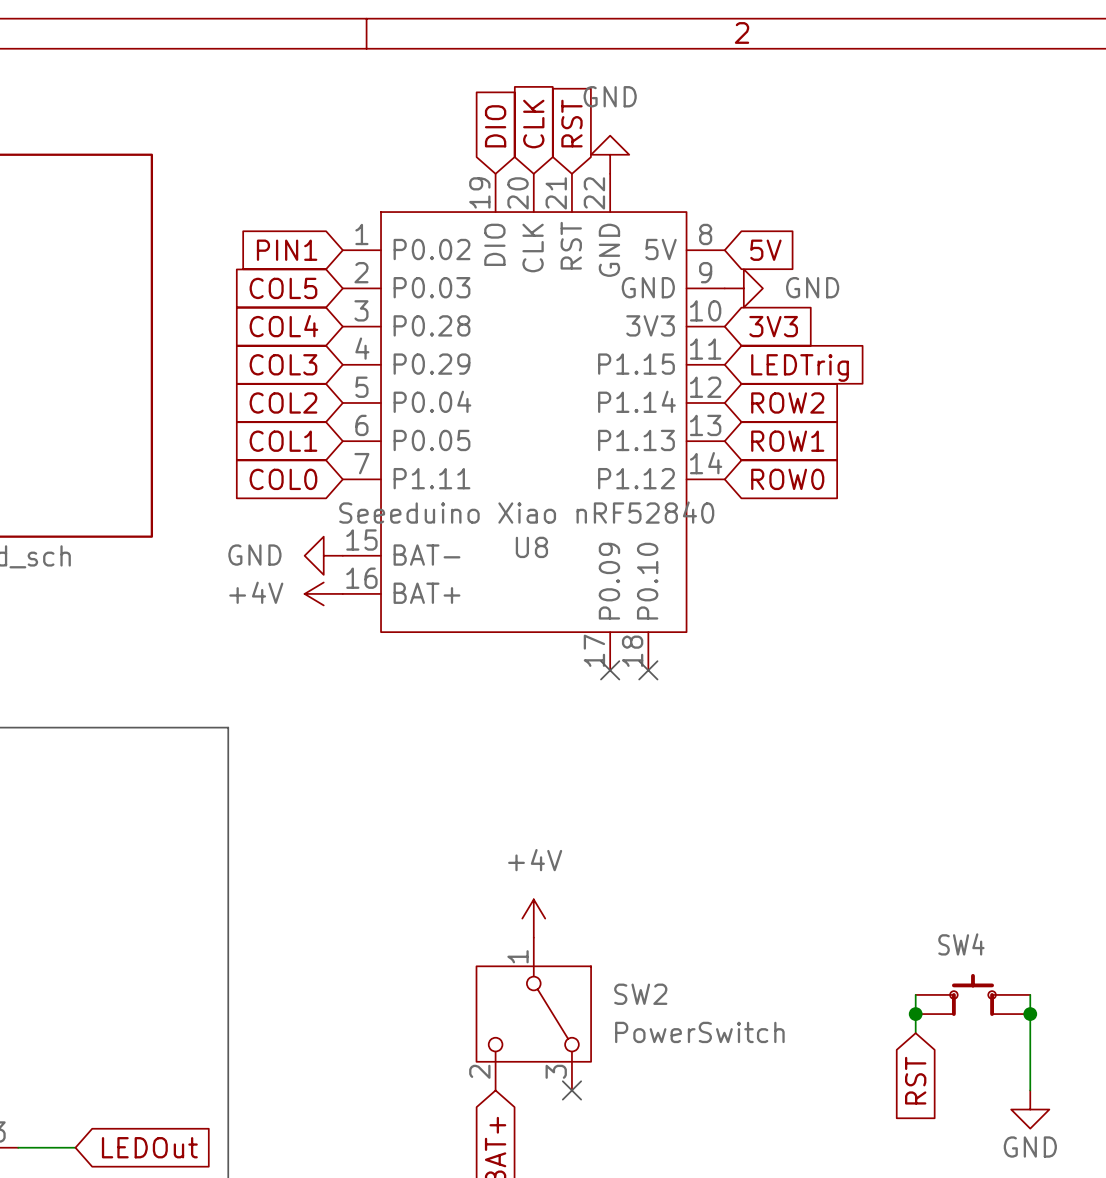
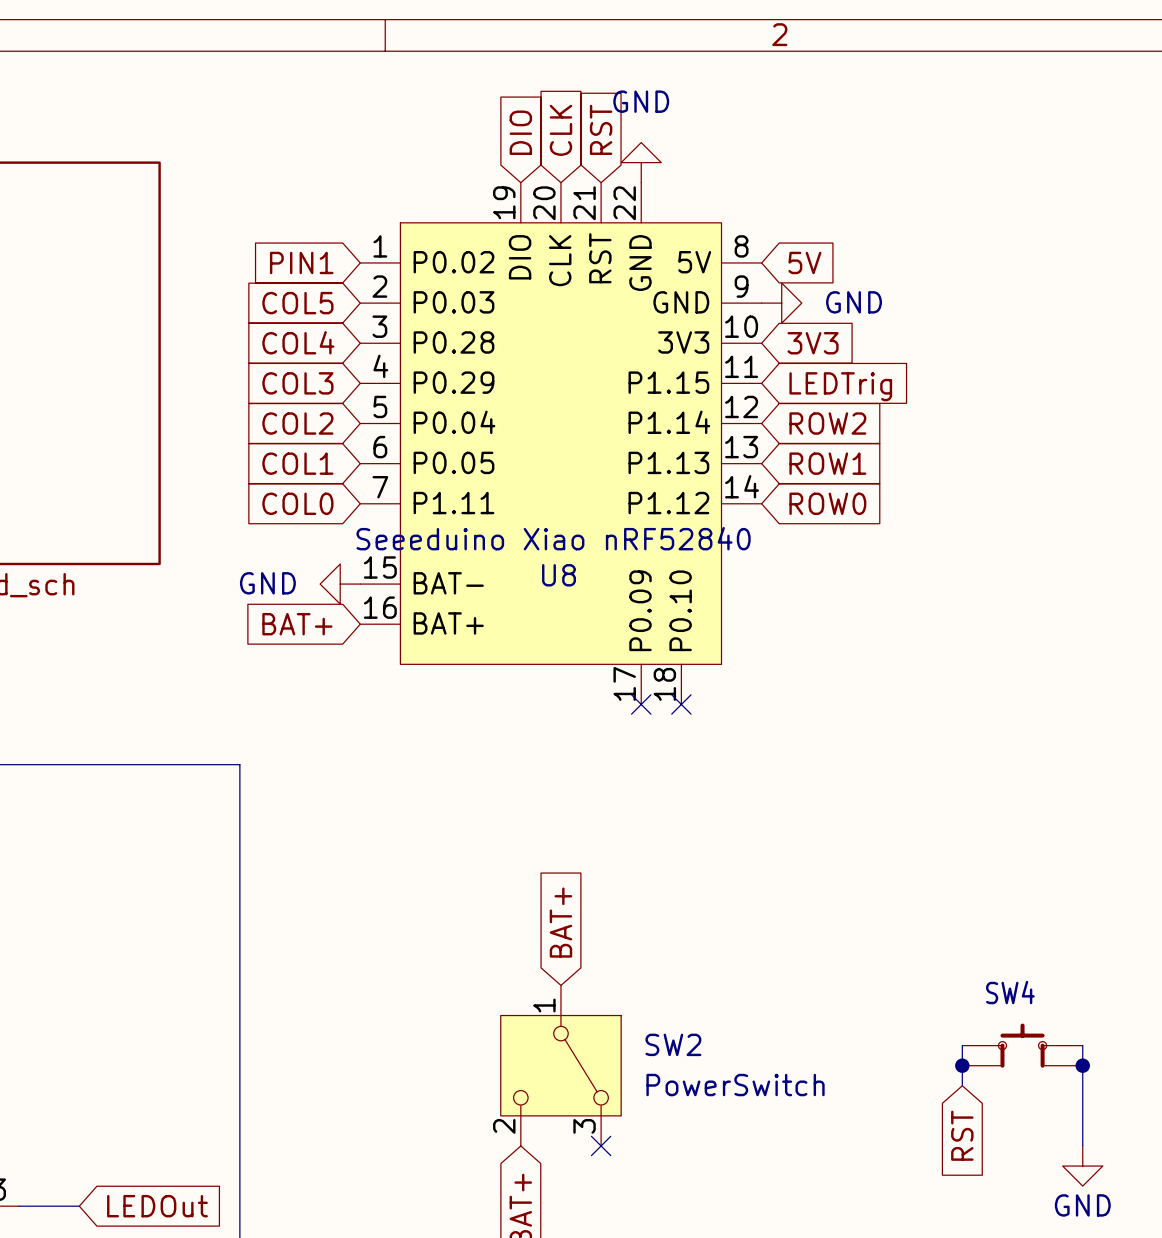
global label: none -> BAT+ (297, 624)
power symbol: +4V (323, 593) -> none
global label: none -> BAT+ (560, 922)
power symbol: +4V (533, 918) -> none

